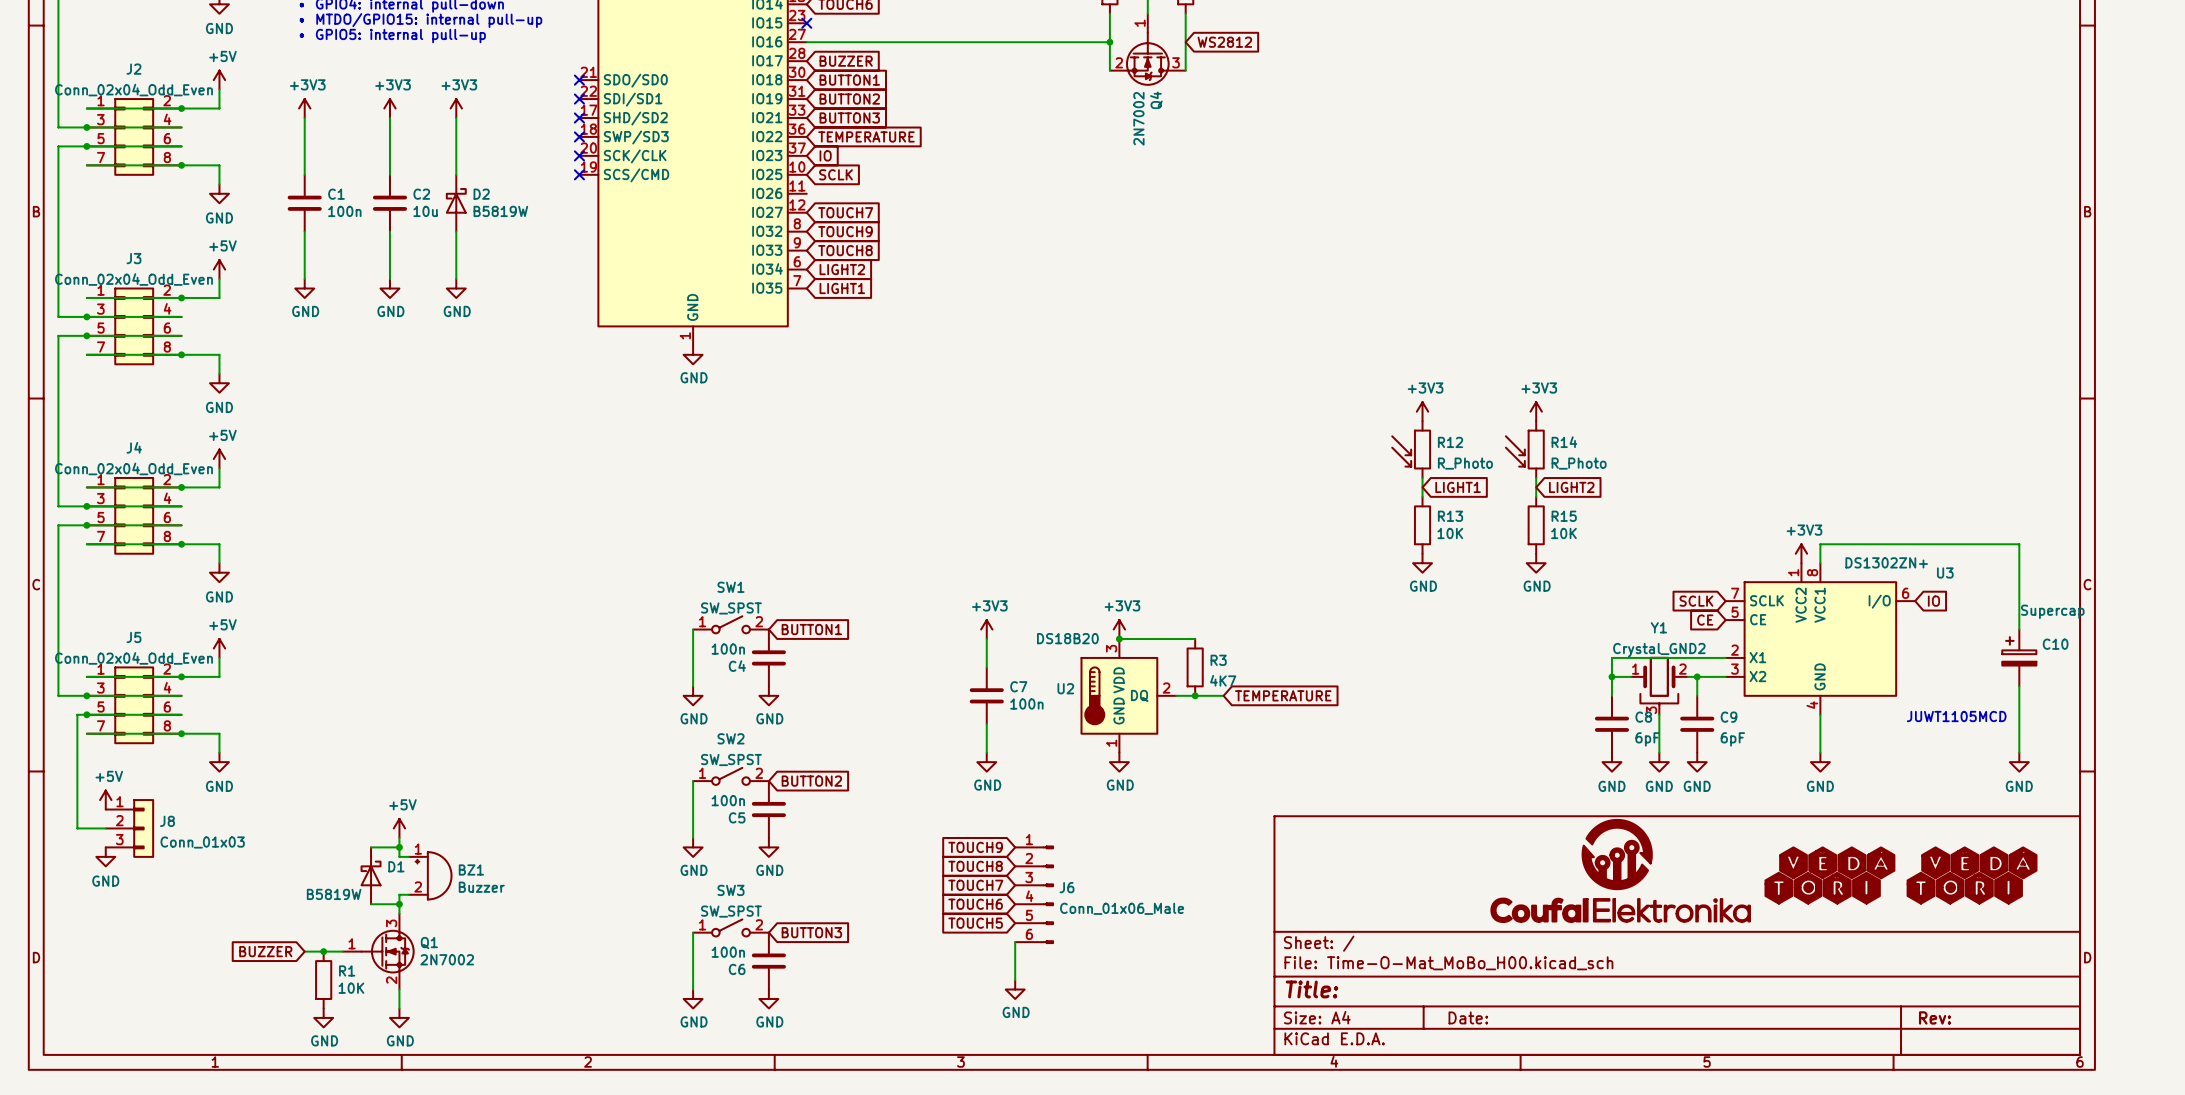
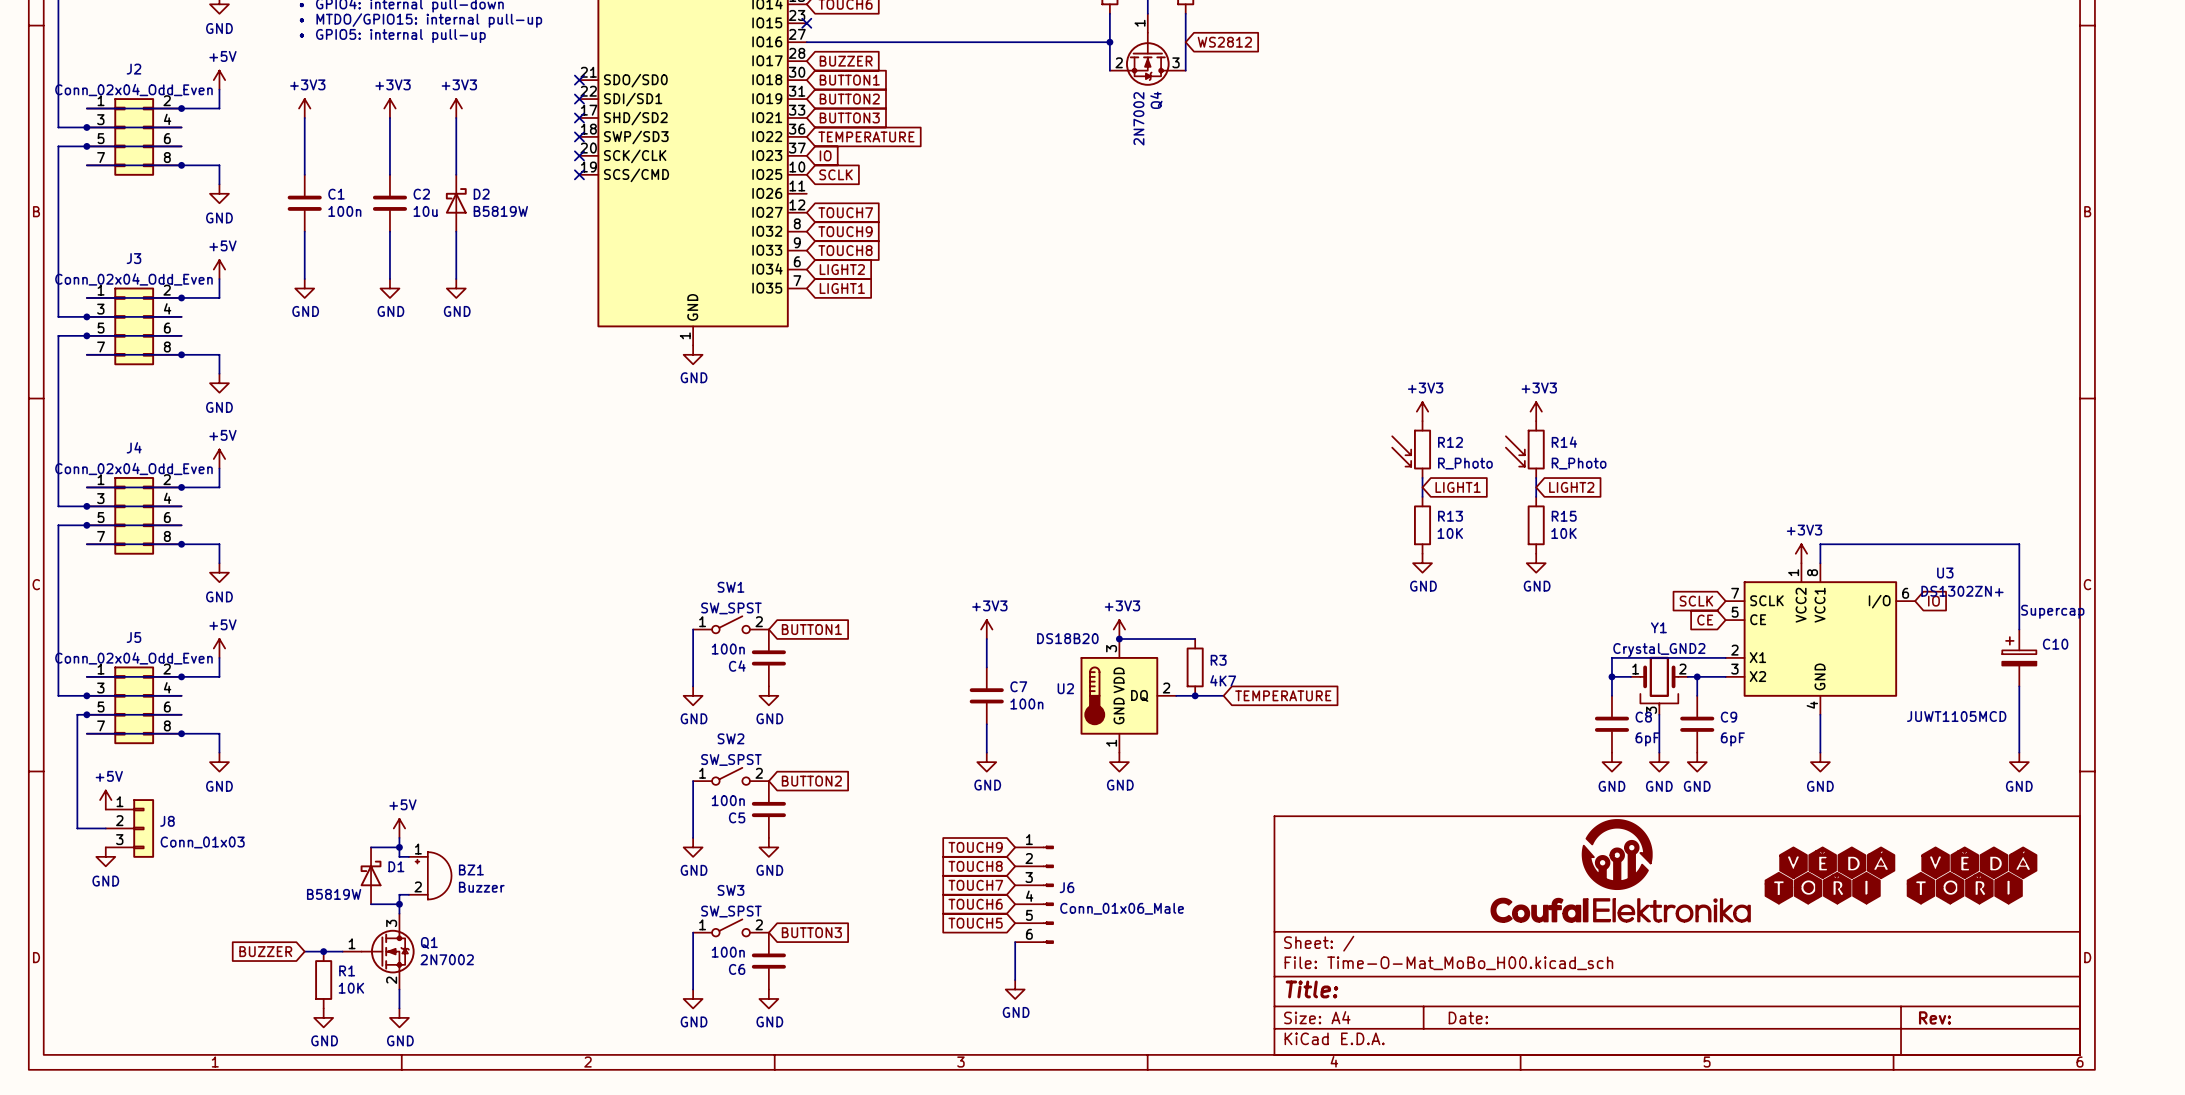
U3 value position: DS1302ZN+ (1886, 562) -> DS1302ZN+ (1962, 591)

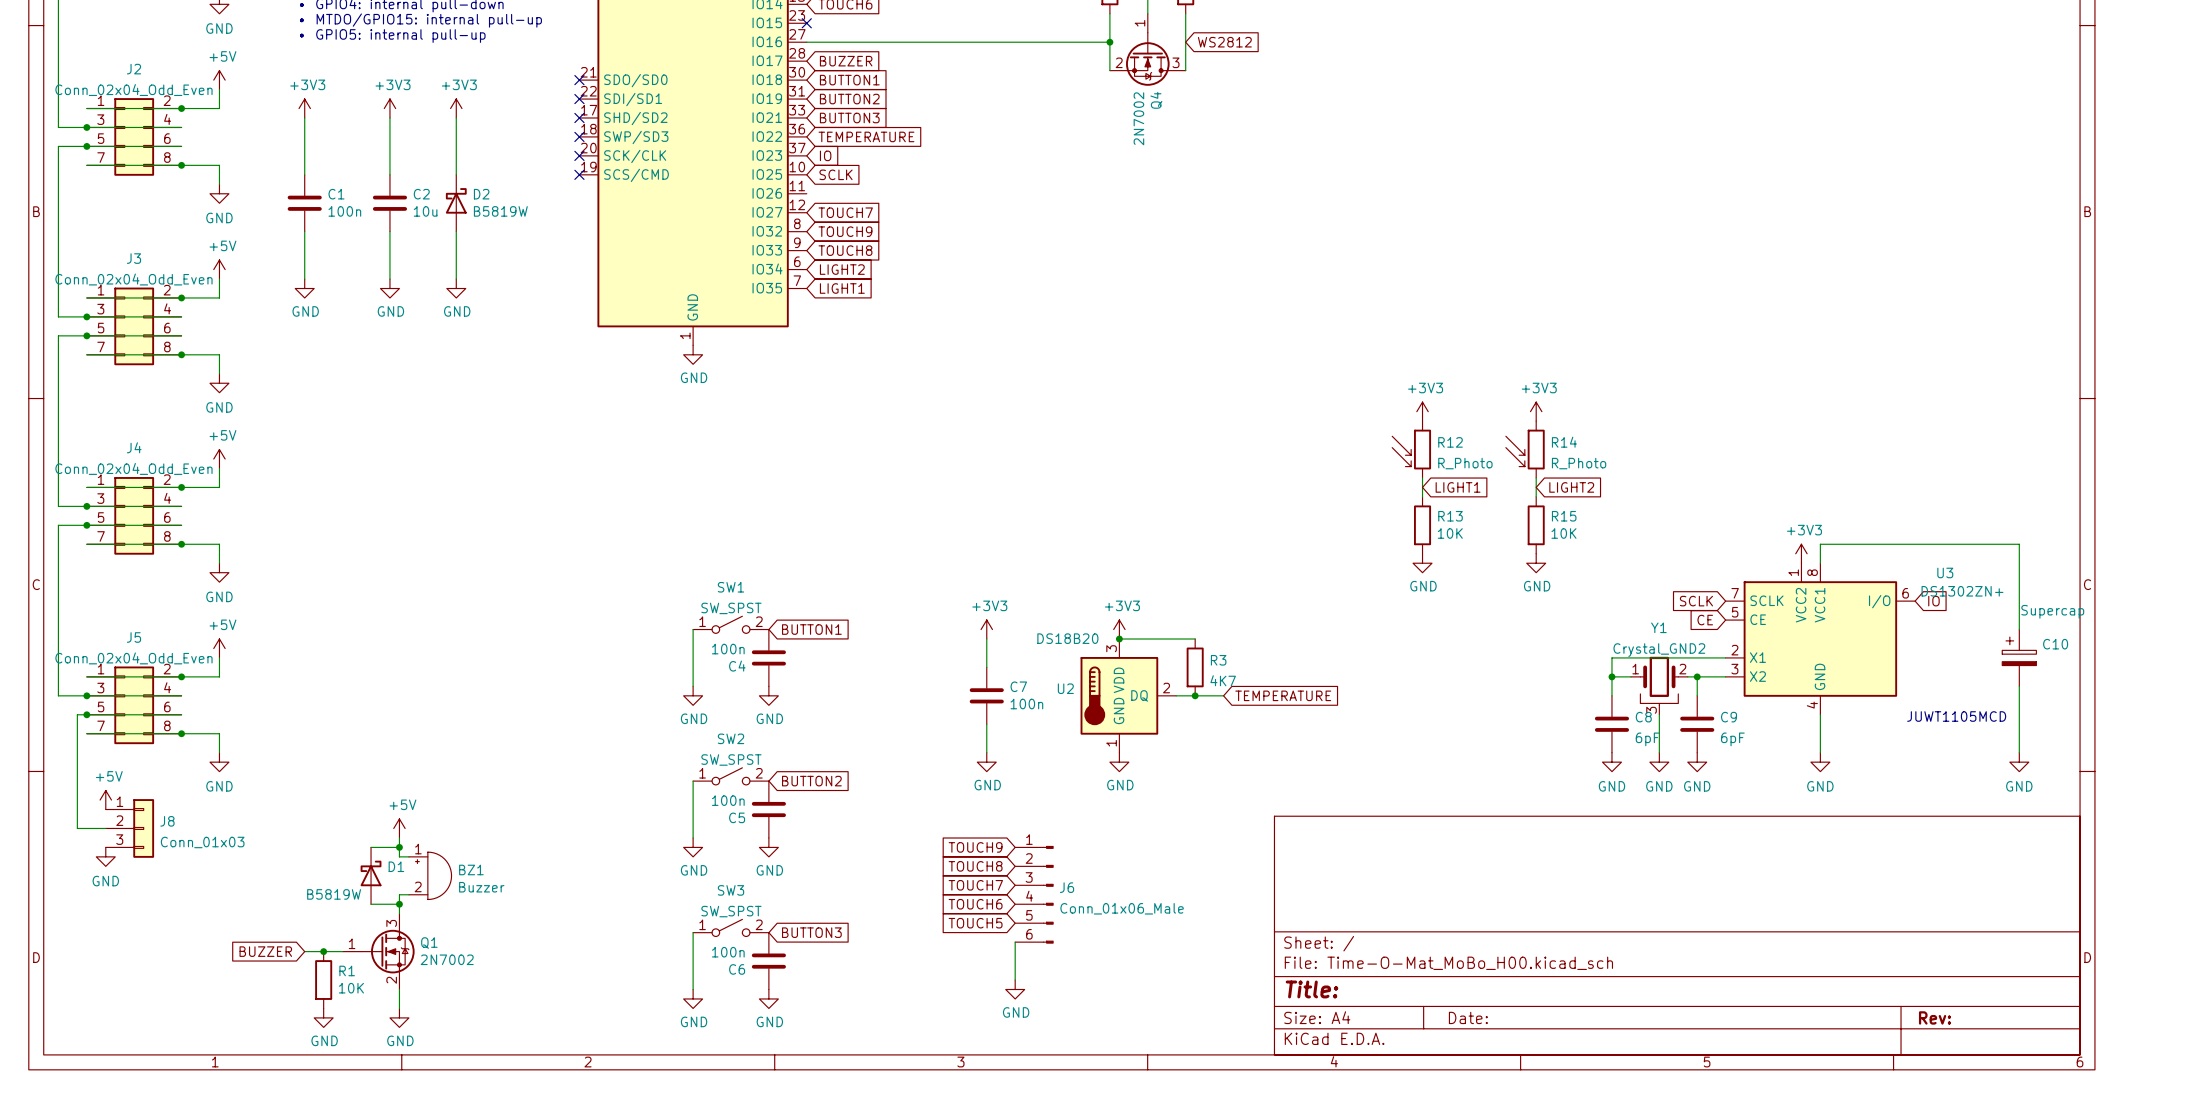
part: (1620, 870) -> none
part: (1829, 875) -> none
part: (1972, 875) -> none

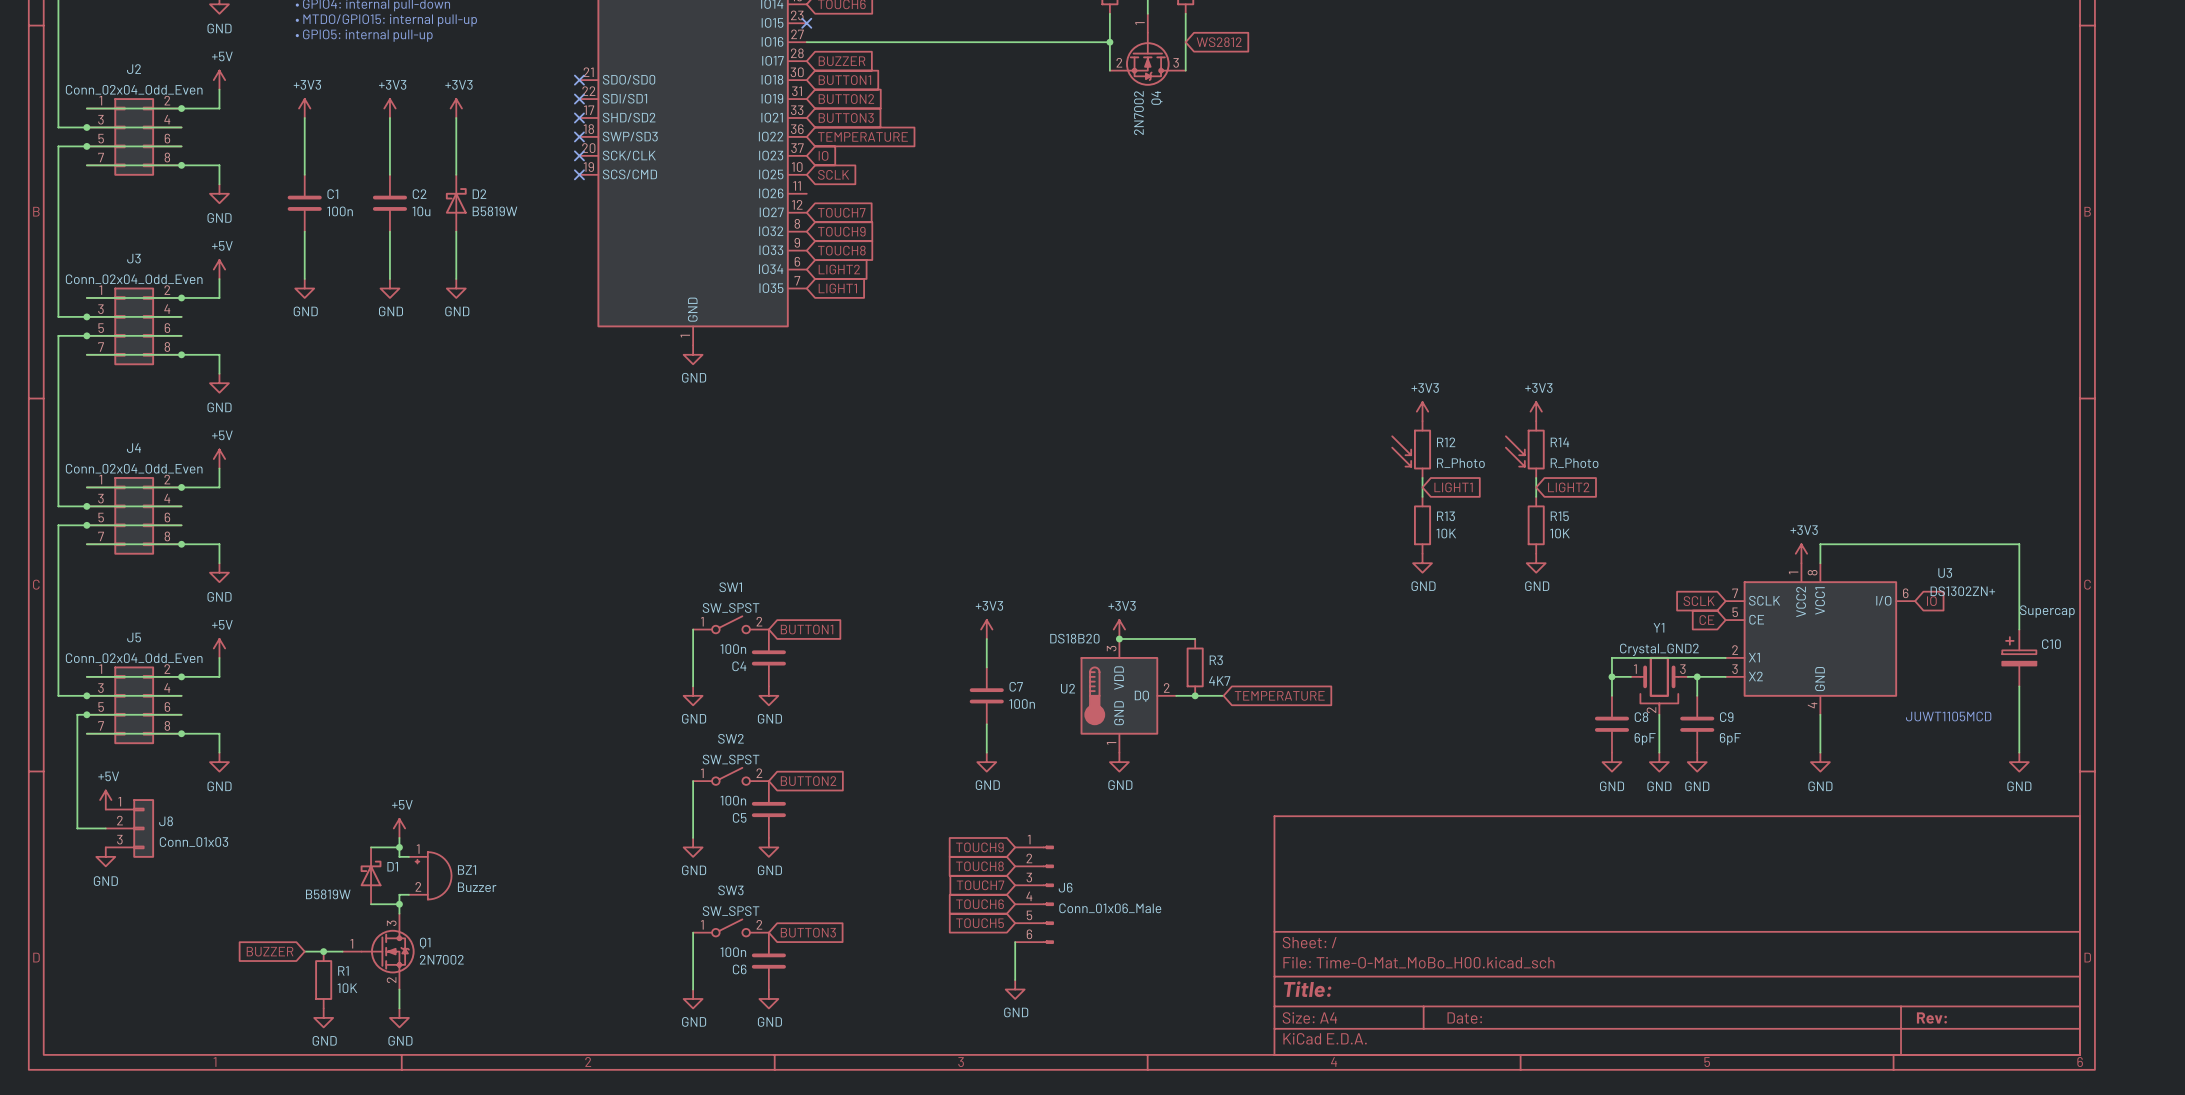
Y1 pin number: 2 (1682, 669) -> 3 (1682, 669)
Y1 pin number: 3 (1651, 710) -> 2 (1651, 710)

